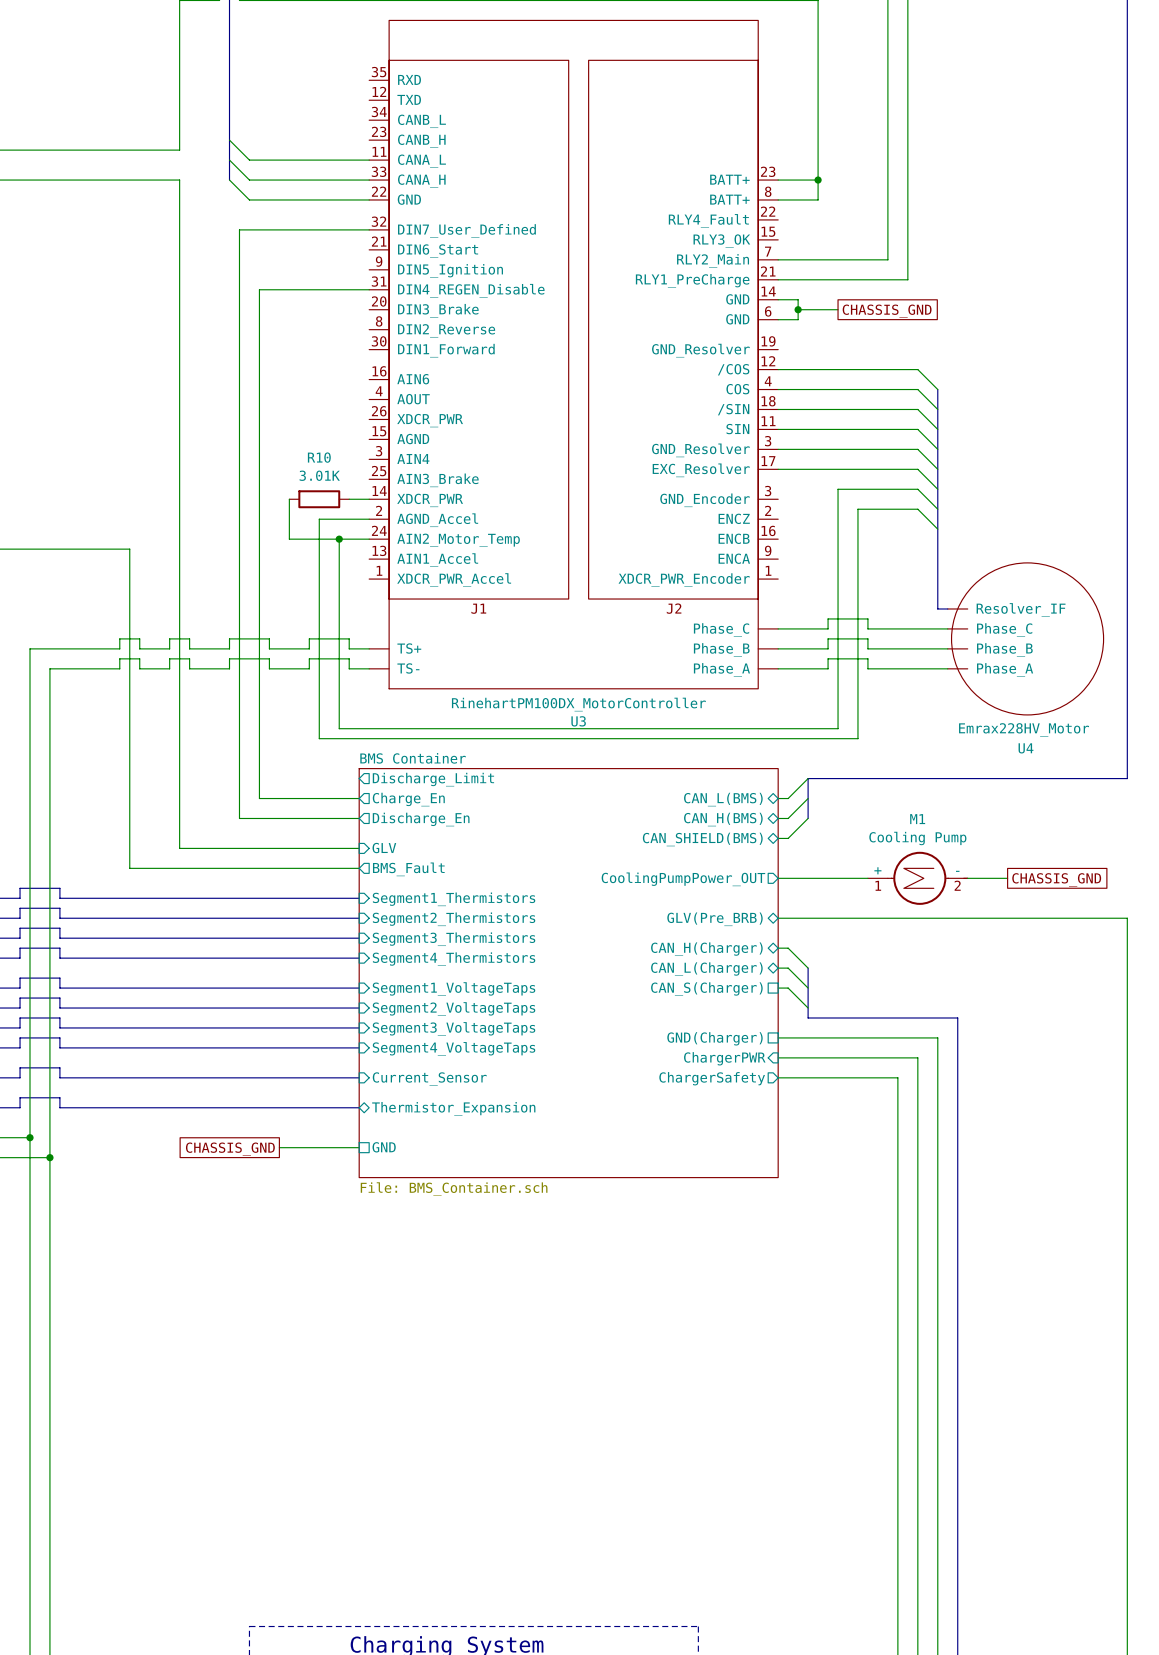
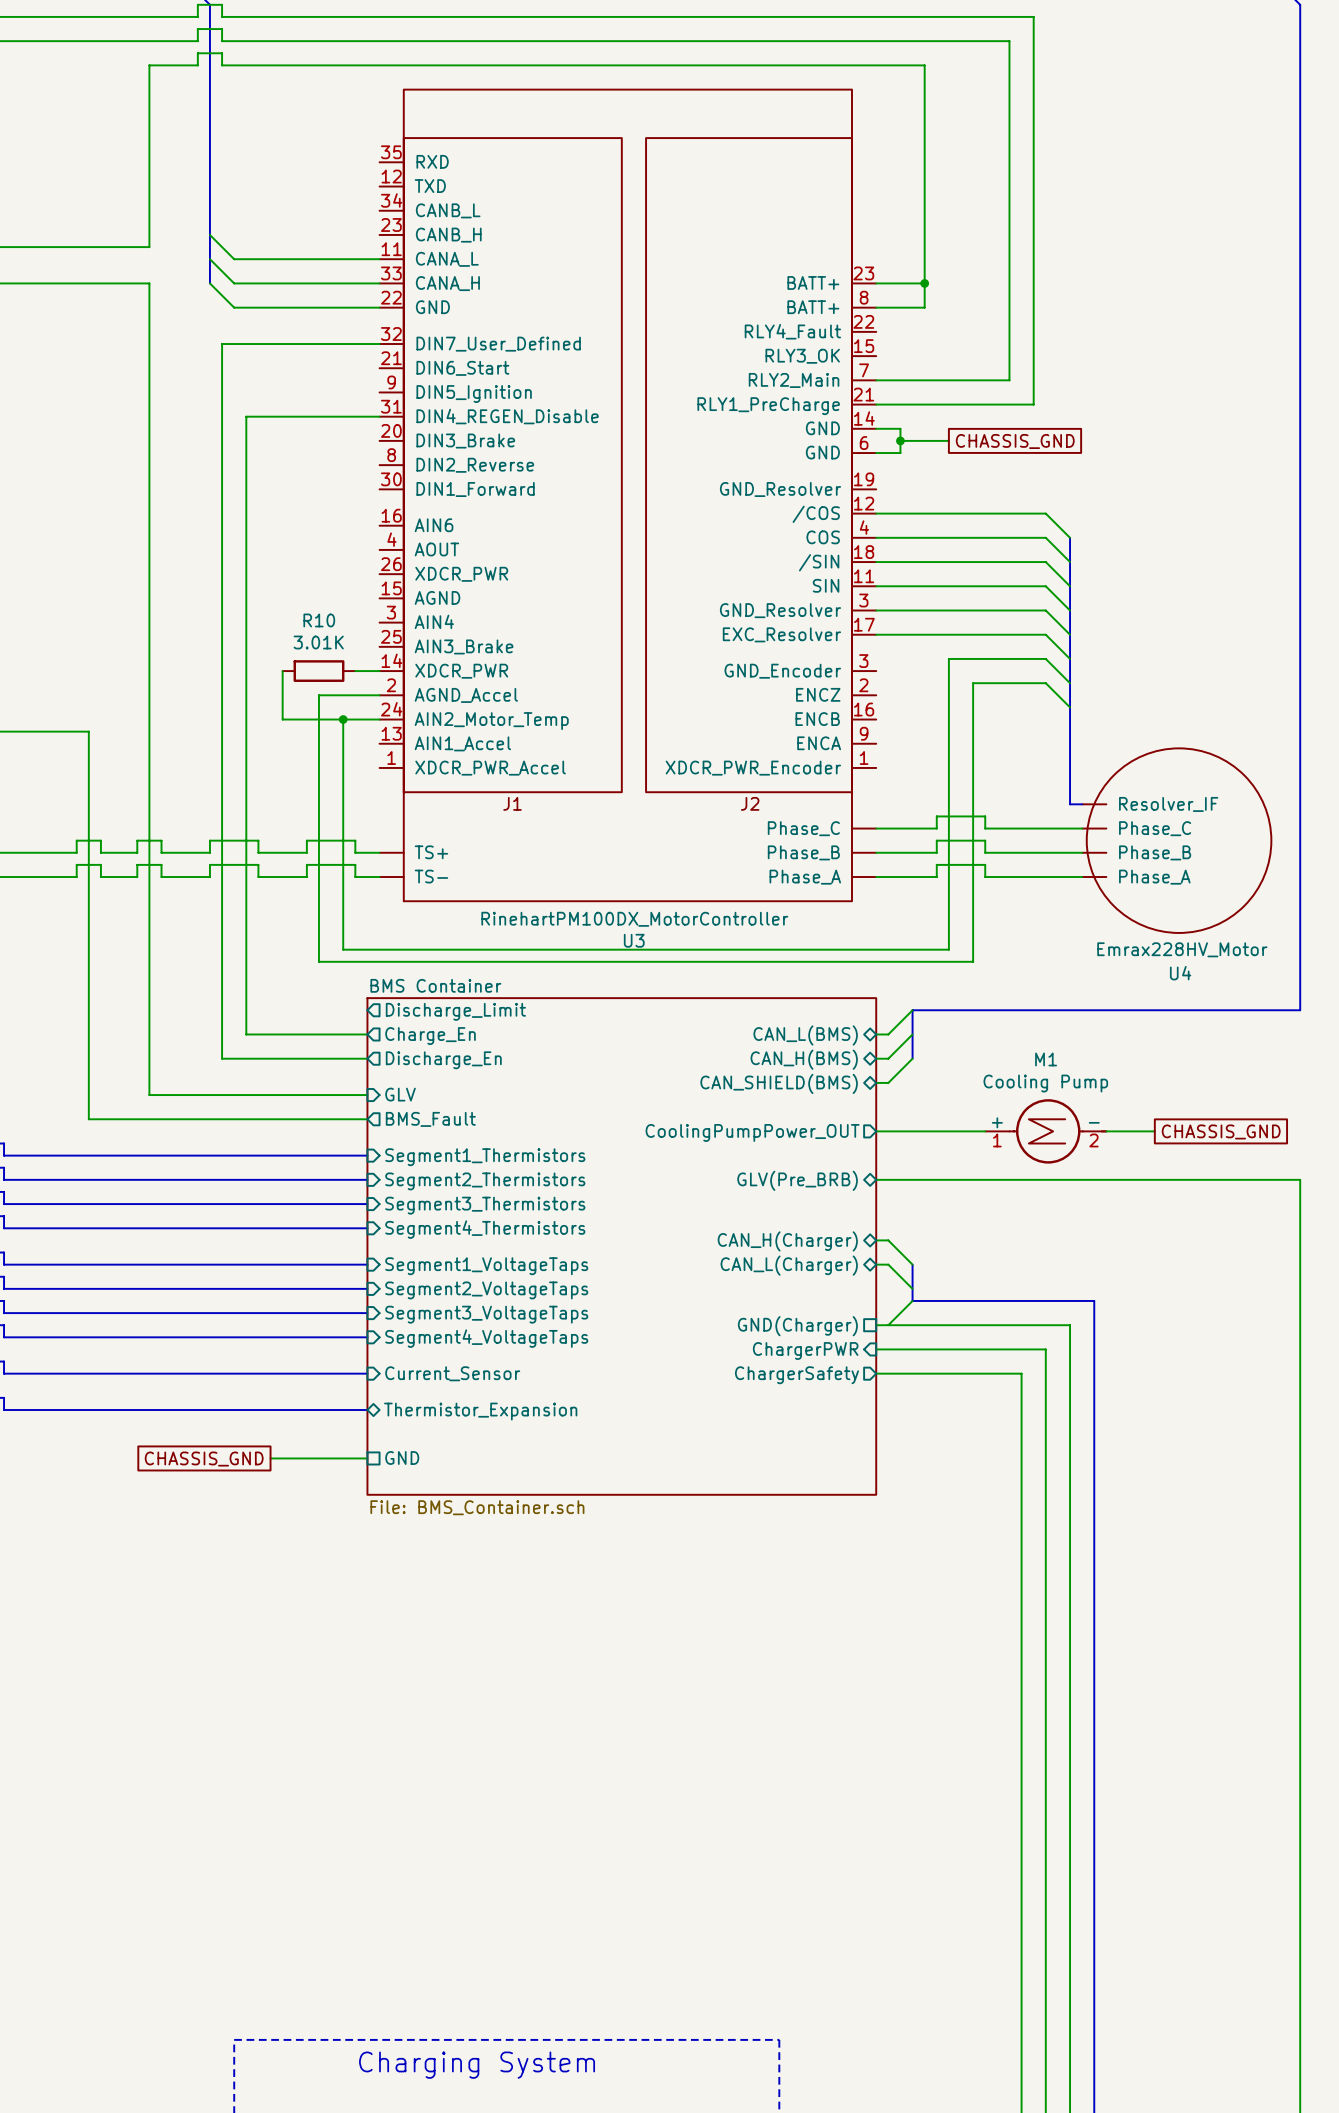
wire: (778, 948) (788, 948) (808, 968) -> none
sheet pin: CAN_H(Charger) (706, 949) -> none
bus: (808, 968) (808, 988) -> none
sheet pin: CAN_L(Charger) (706, 969) -> CAN_H(Charger) (787, 1241)
sheet pin shape: passive (706, 989) -> bidirectional (789, 1265)
sheet pin: CAN_S(Charger) (706, 989) -> CAN_L(Charger) (789, 1265)
wire: none -> (912, 1300) (888, 1325)

